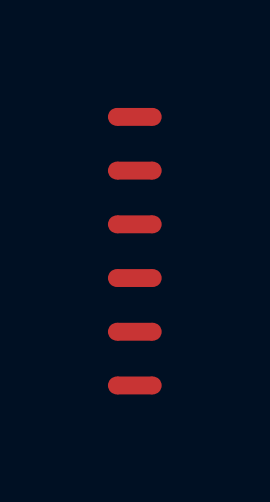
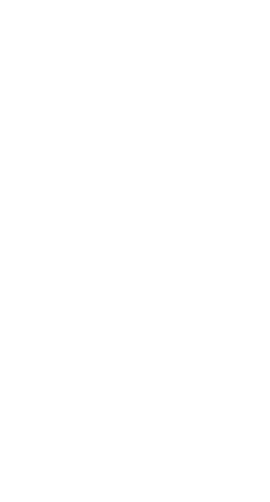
part: (134, 116) -> none
part: (134, 170) -> none
part: (134, 224) -> none
part: (134, 278) -> none
part: (134, 331) -> none
part: (134, 385) -> none

